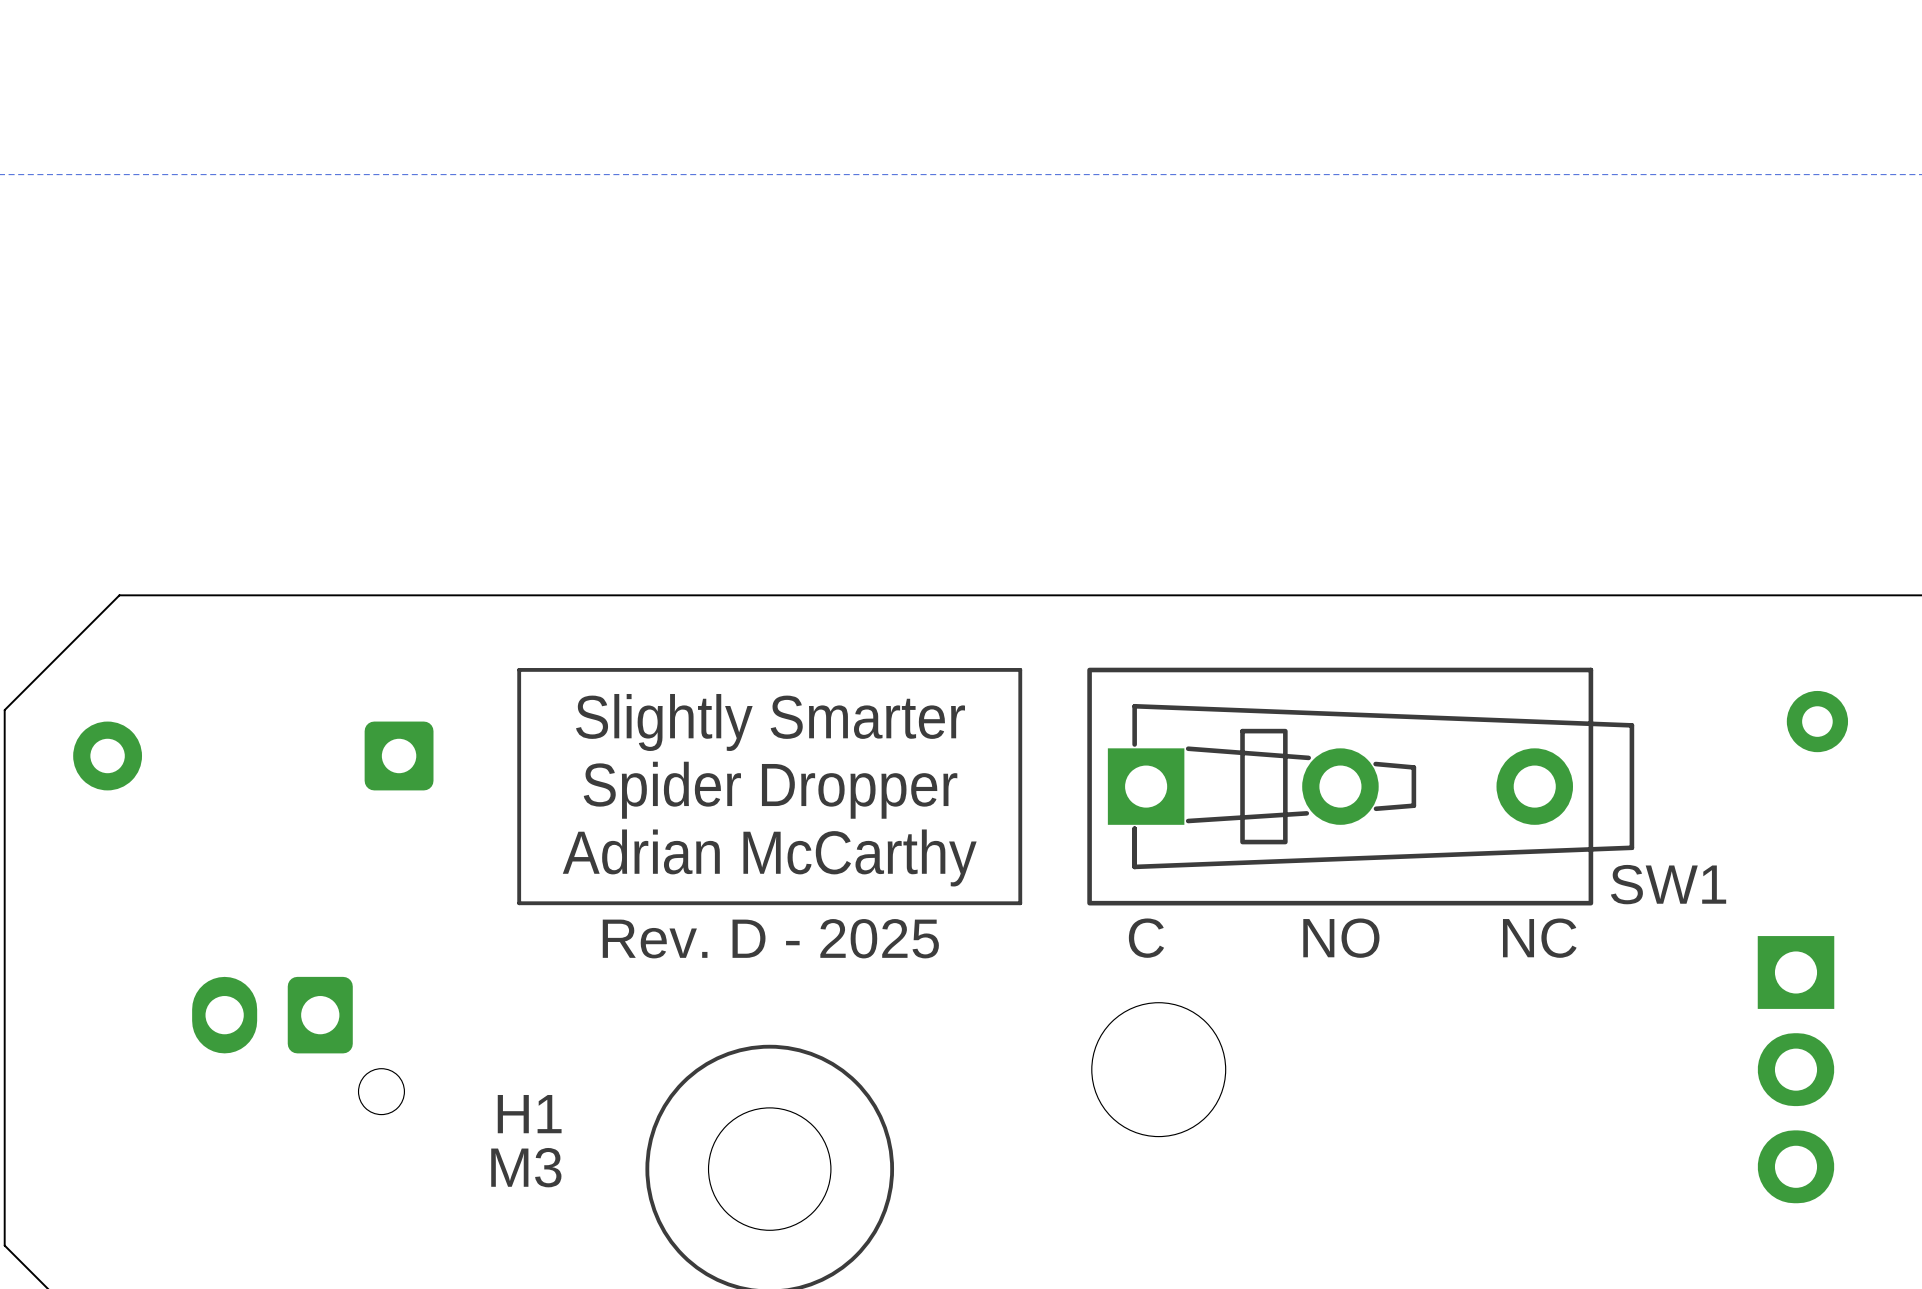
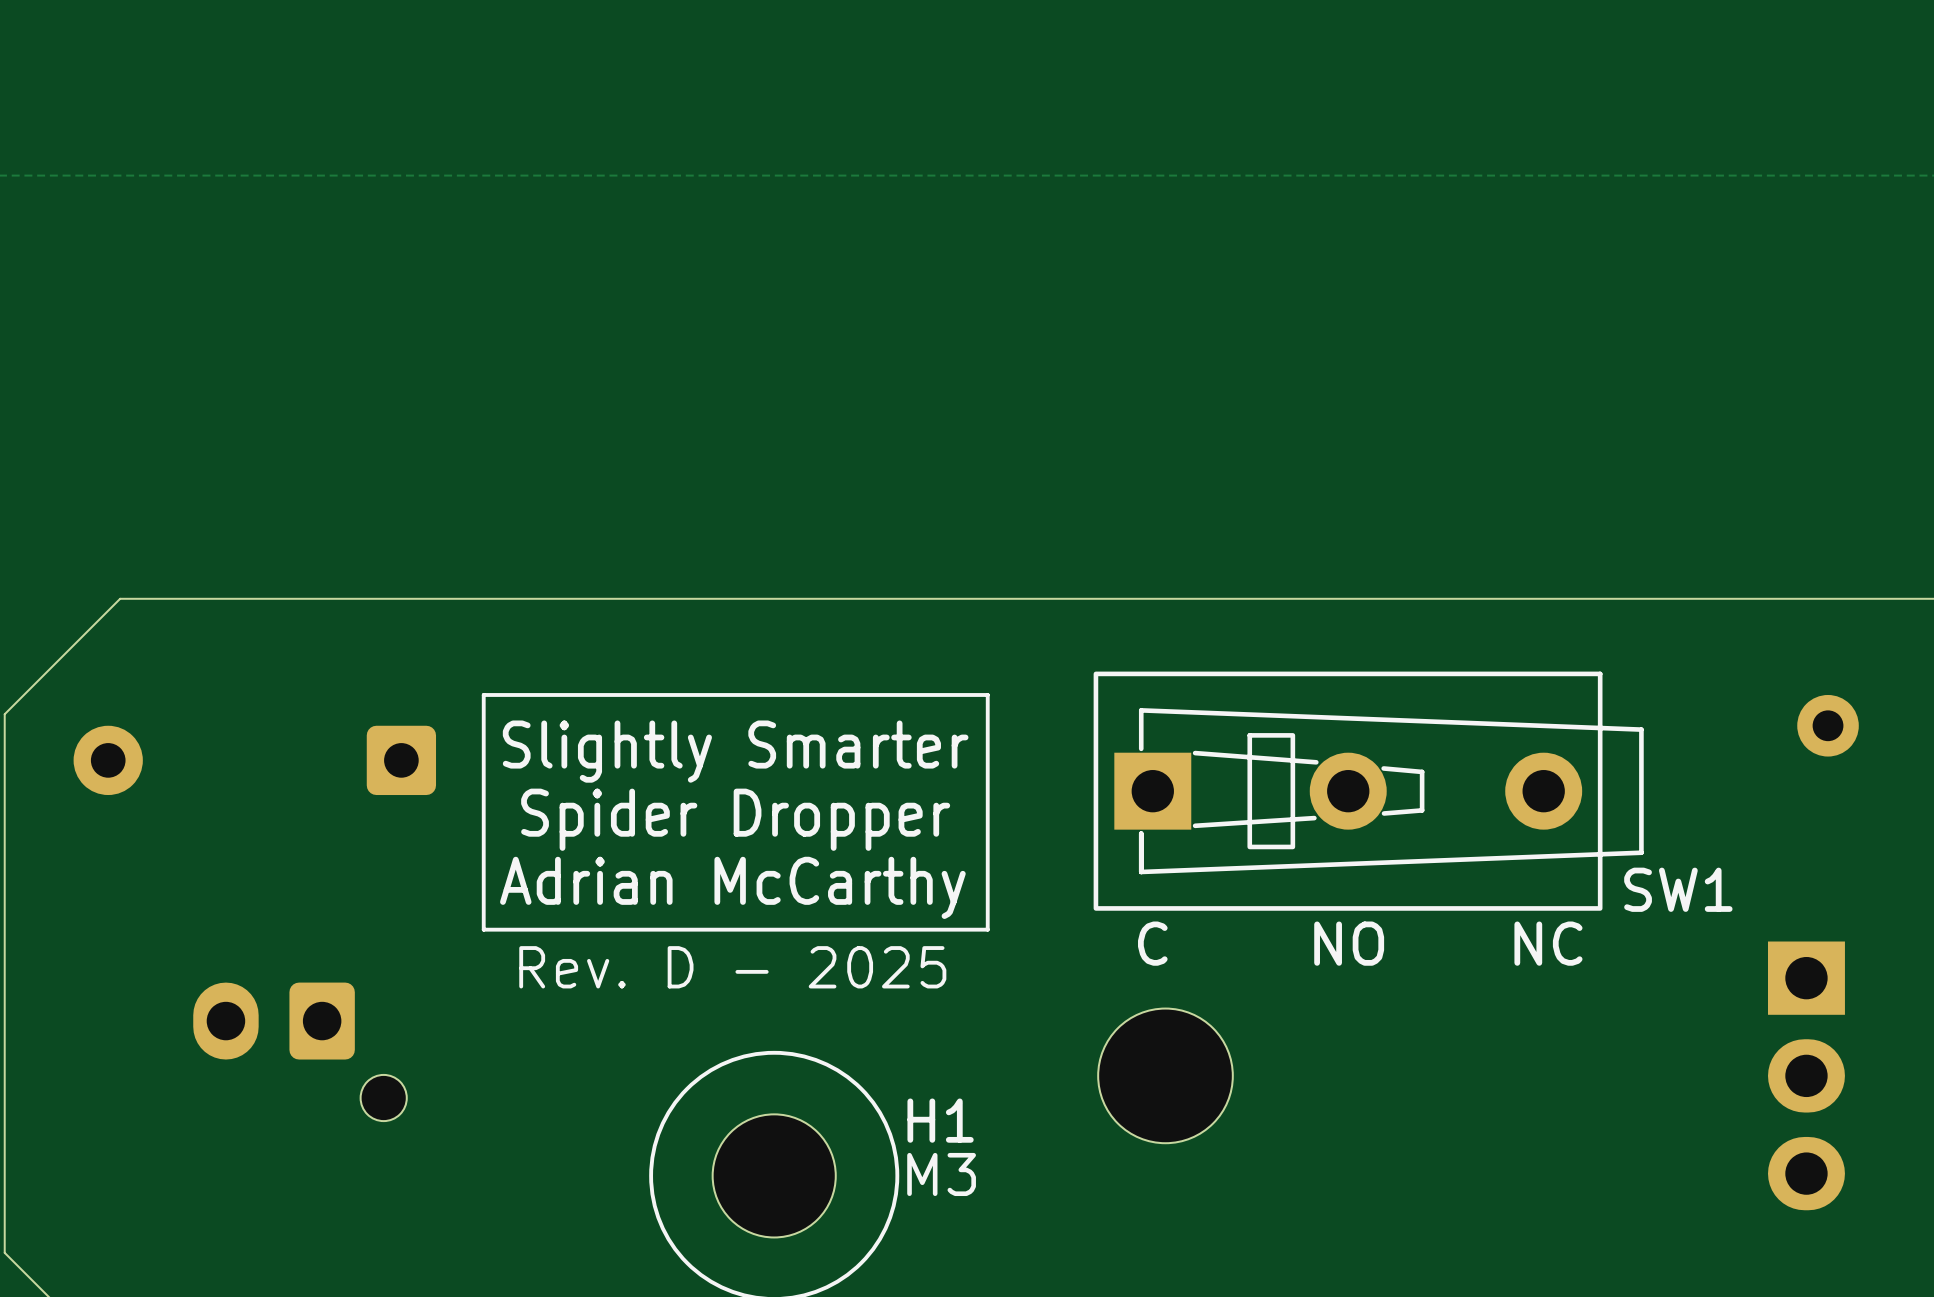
line: (1020, 669) (519, 669) (519, 903) (1020, 903) (1020, 669) -> (987, 694) (987, 929) (483, 929) (483, 694) (987, 694)
text position: Slightly Smarter (770, 722) -> Slightly Smarter (735, 751)
text position: Spider Dropper (770, 790) -> Spider Dropper (735, 819)
text position: Adrian McCarthy (769, 857) -> Adrian McCarthy (732, 887)
text position: Rev. D - 2025 (770, 938) -> Rev. D - 2025 (732, 967)
H1 name position: H1 (529, 1114) -> H1 (940, 1120)
text position: M3 (526, 1167) -> M3 (941, 1174)

